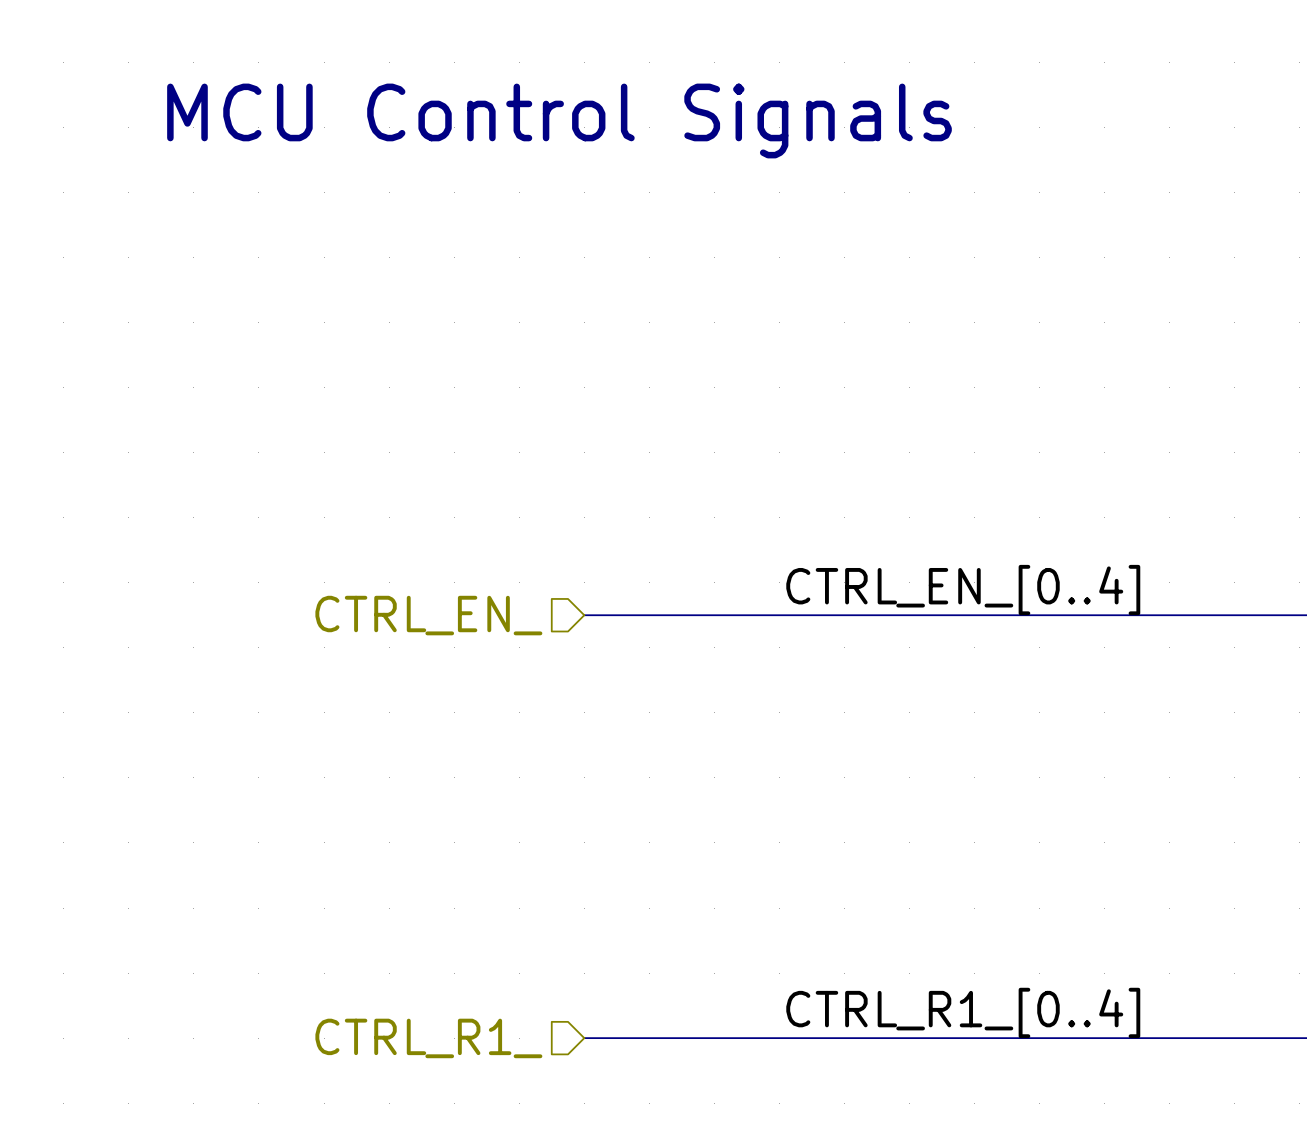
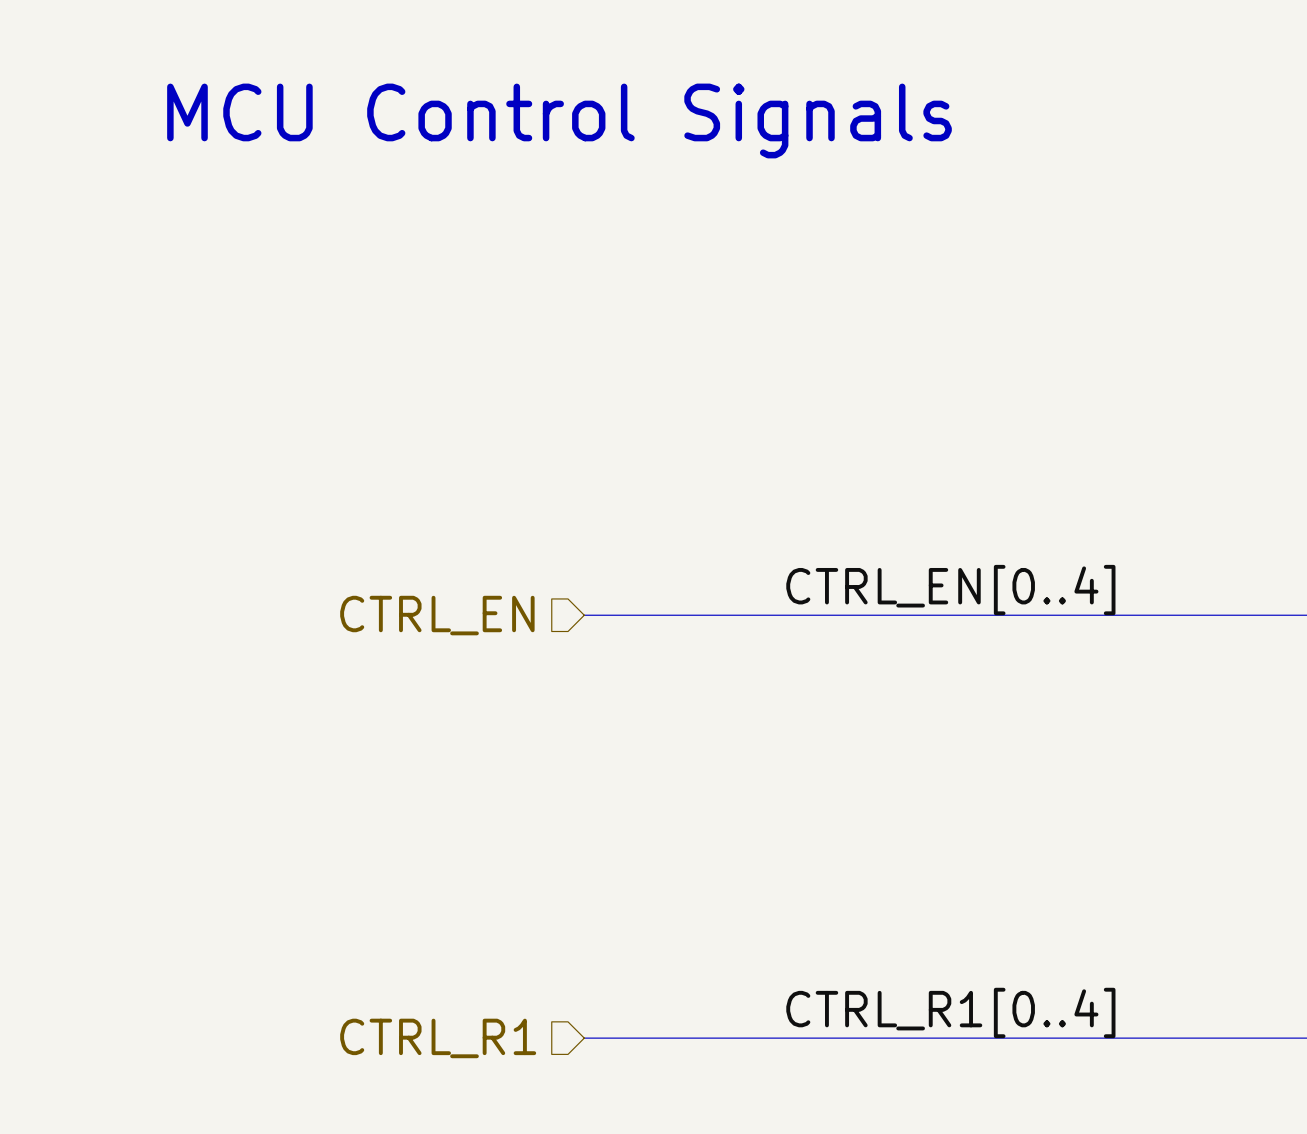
label: CTRL_EN_[0..4] (963, 590) -> CTRL_EN[0..4] (950, 590)
hierarchical label: CTRL_EN_ (428, 615) -> CTRL_EN (437, 615)
label: CTRL_R1_[0..4] (963, 1012) -> CTRL_R1[0..4] (950, 1012)
hierarchical label: CTRL_R1_ (428, 1038) -> CTRL_R1 (438, 1038)

